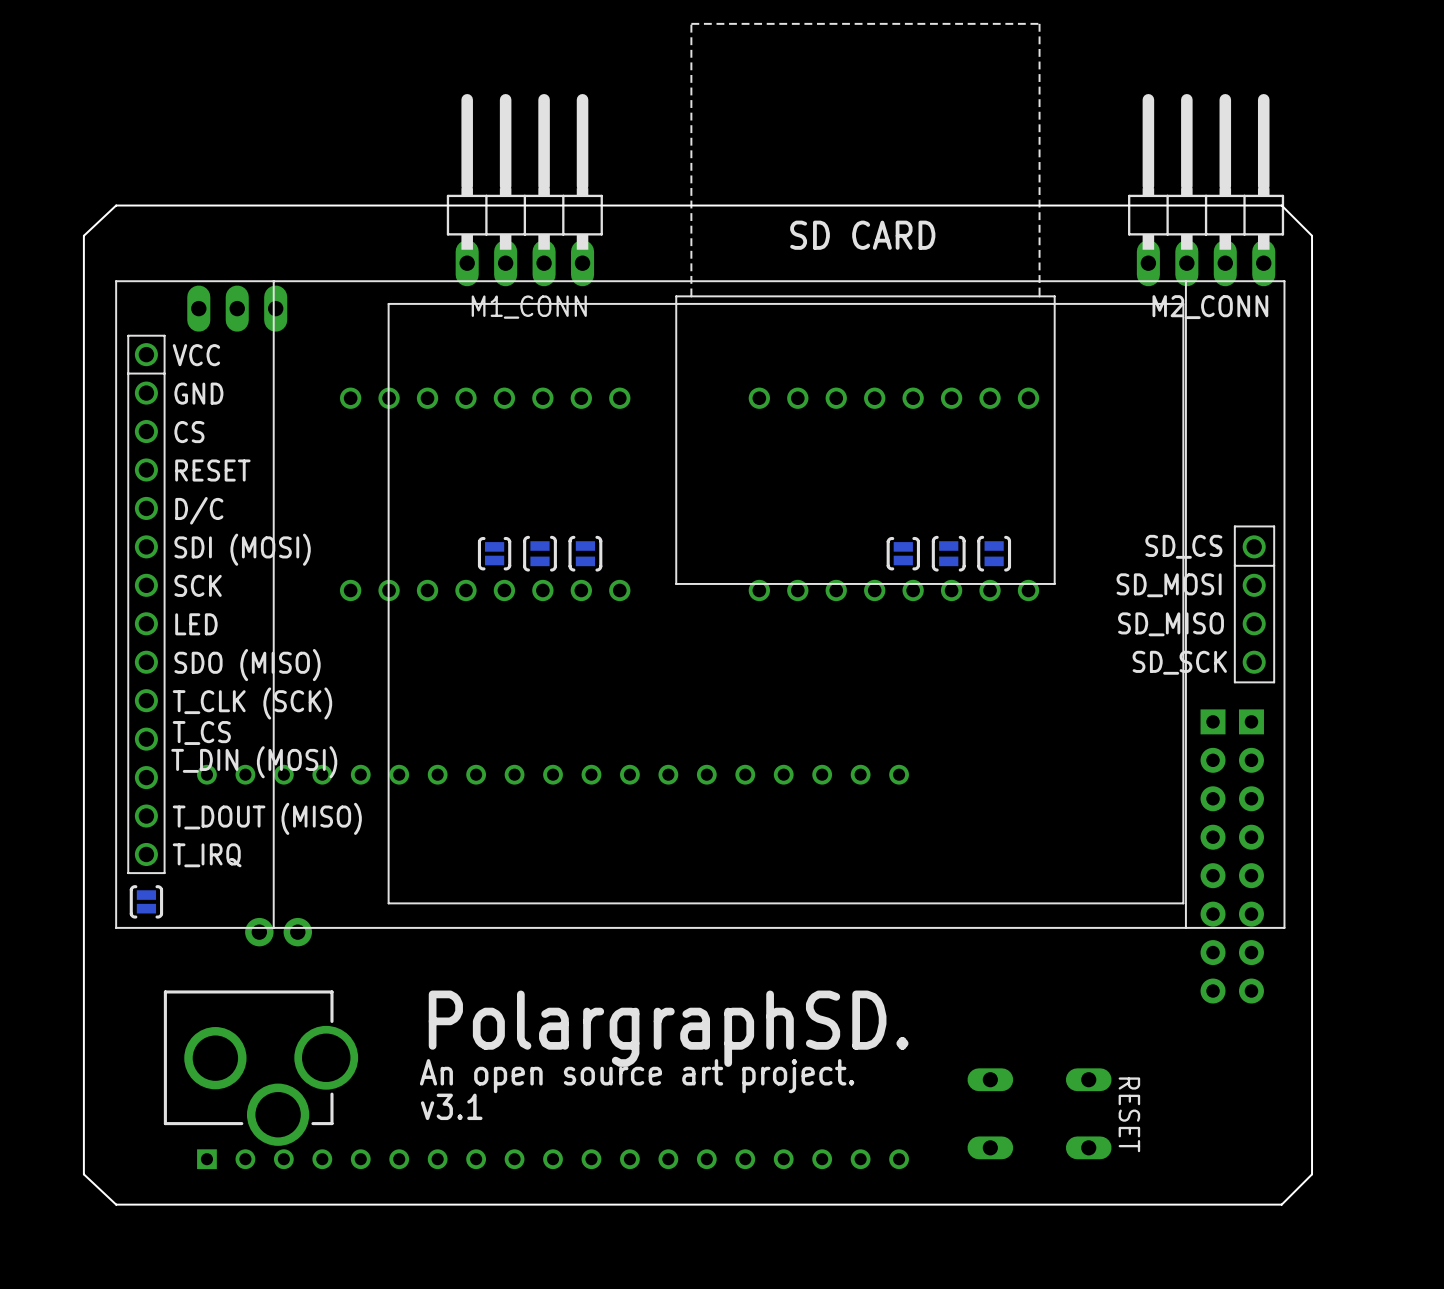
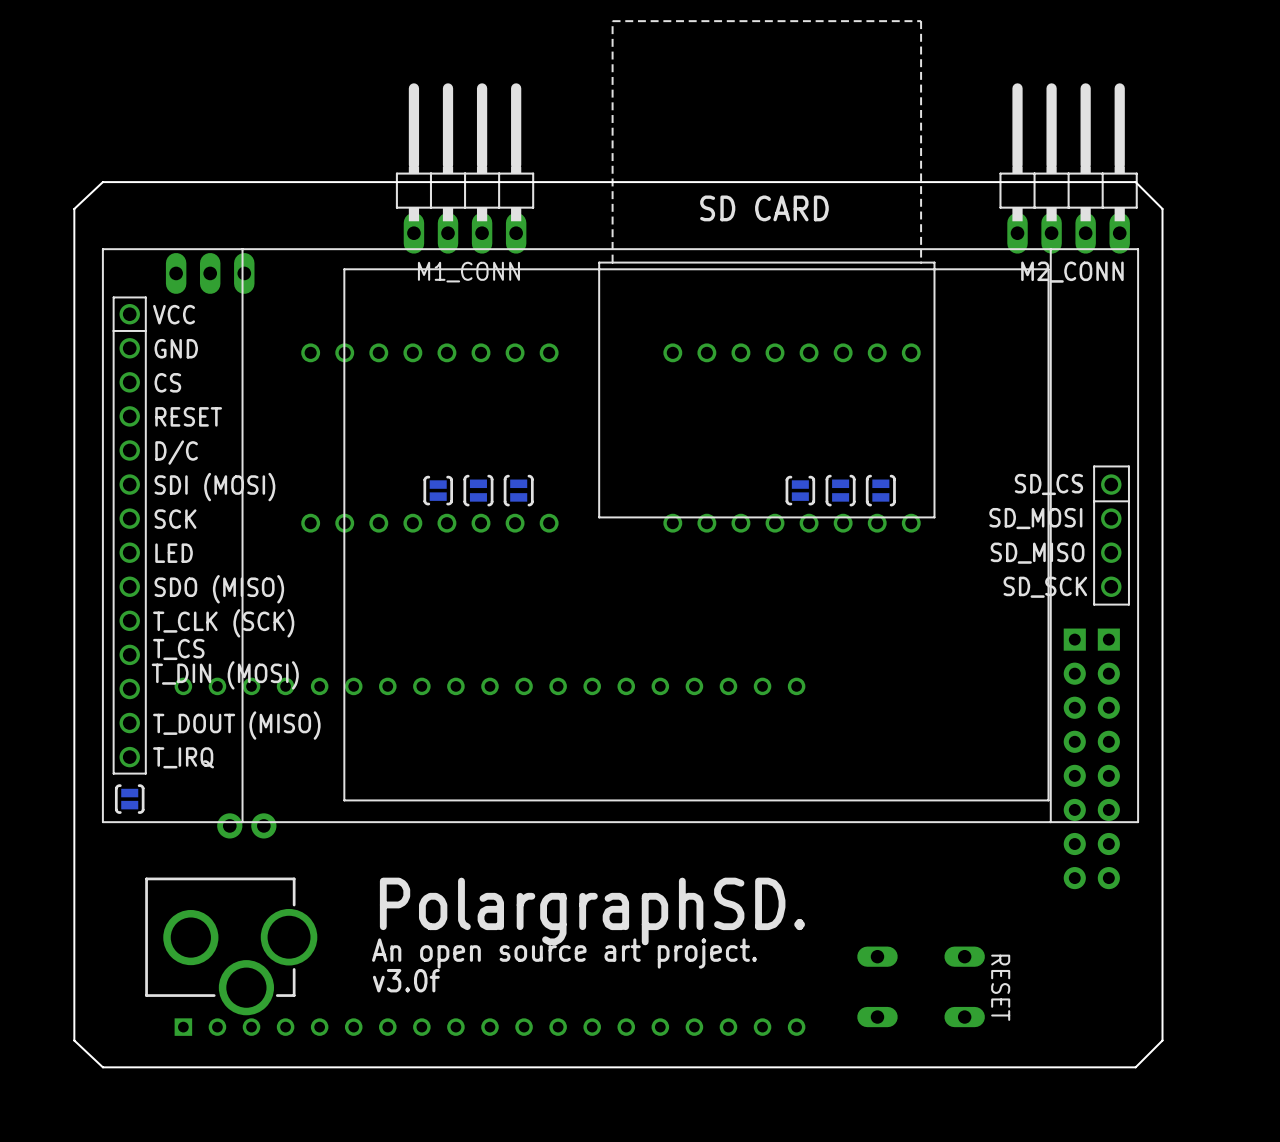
text: v3.1 (451, 1106) -> v3.0f (406, 980)

